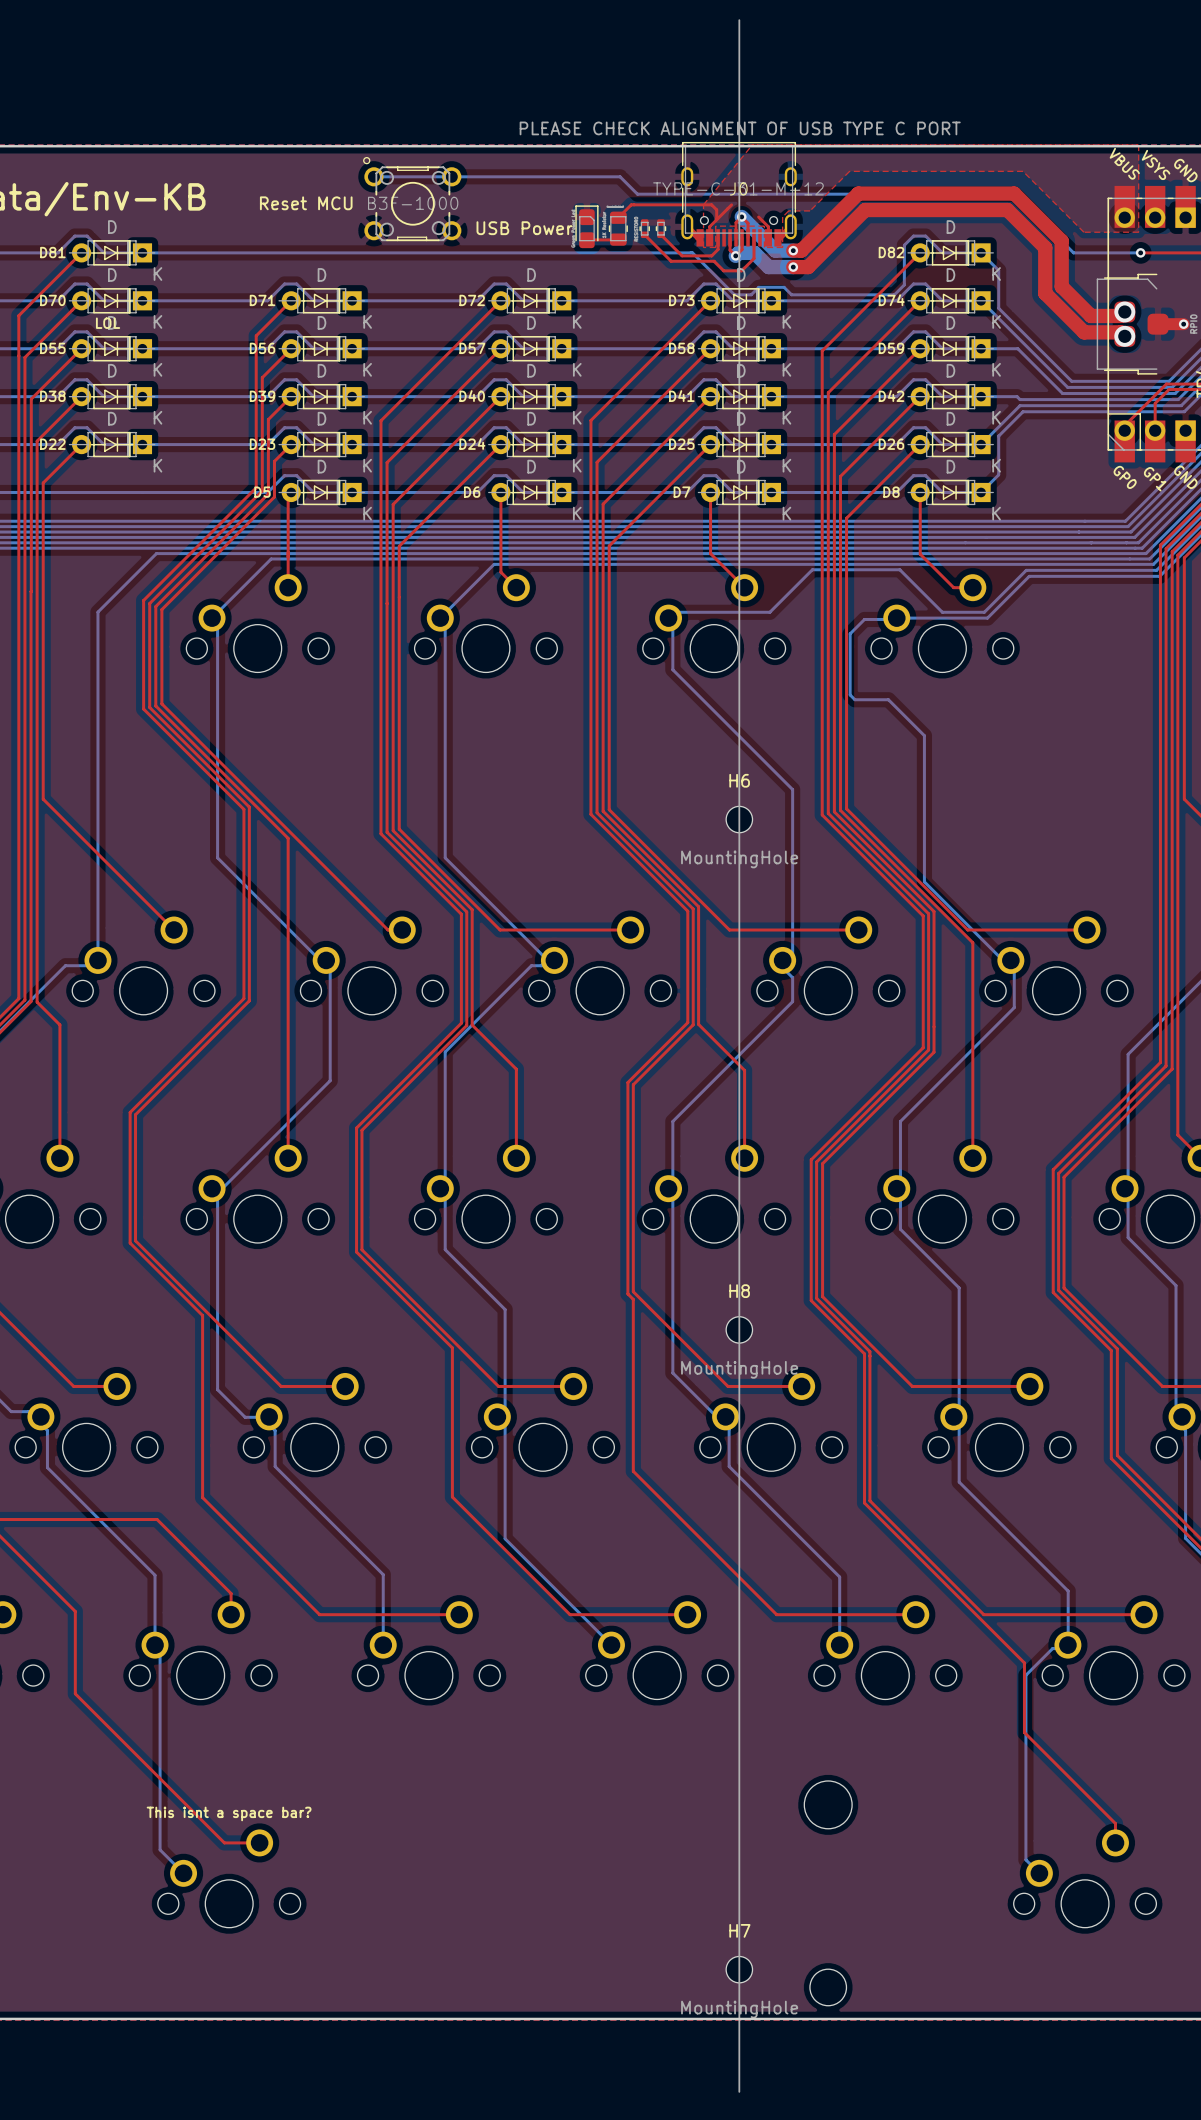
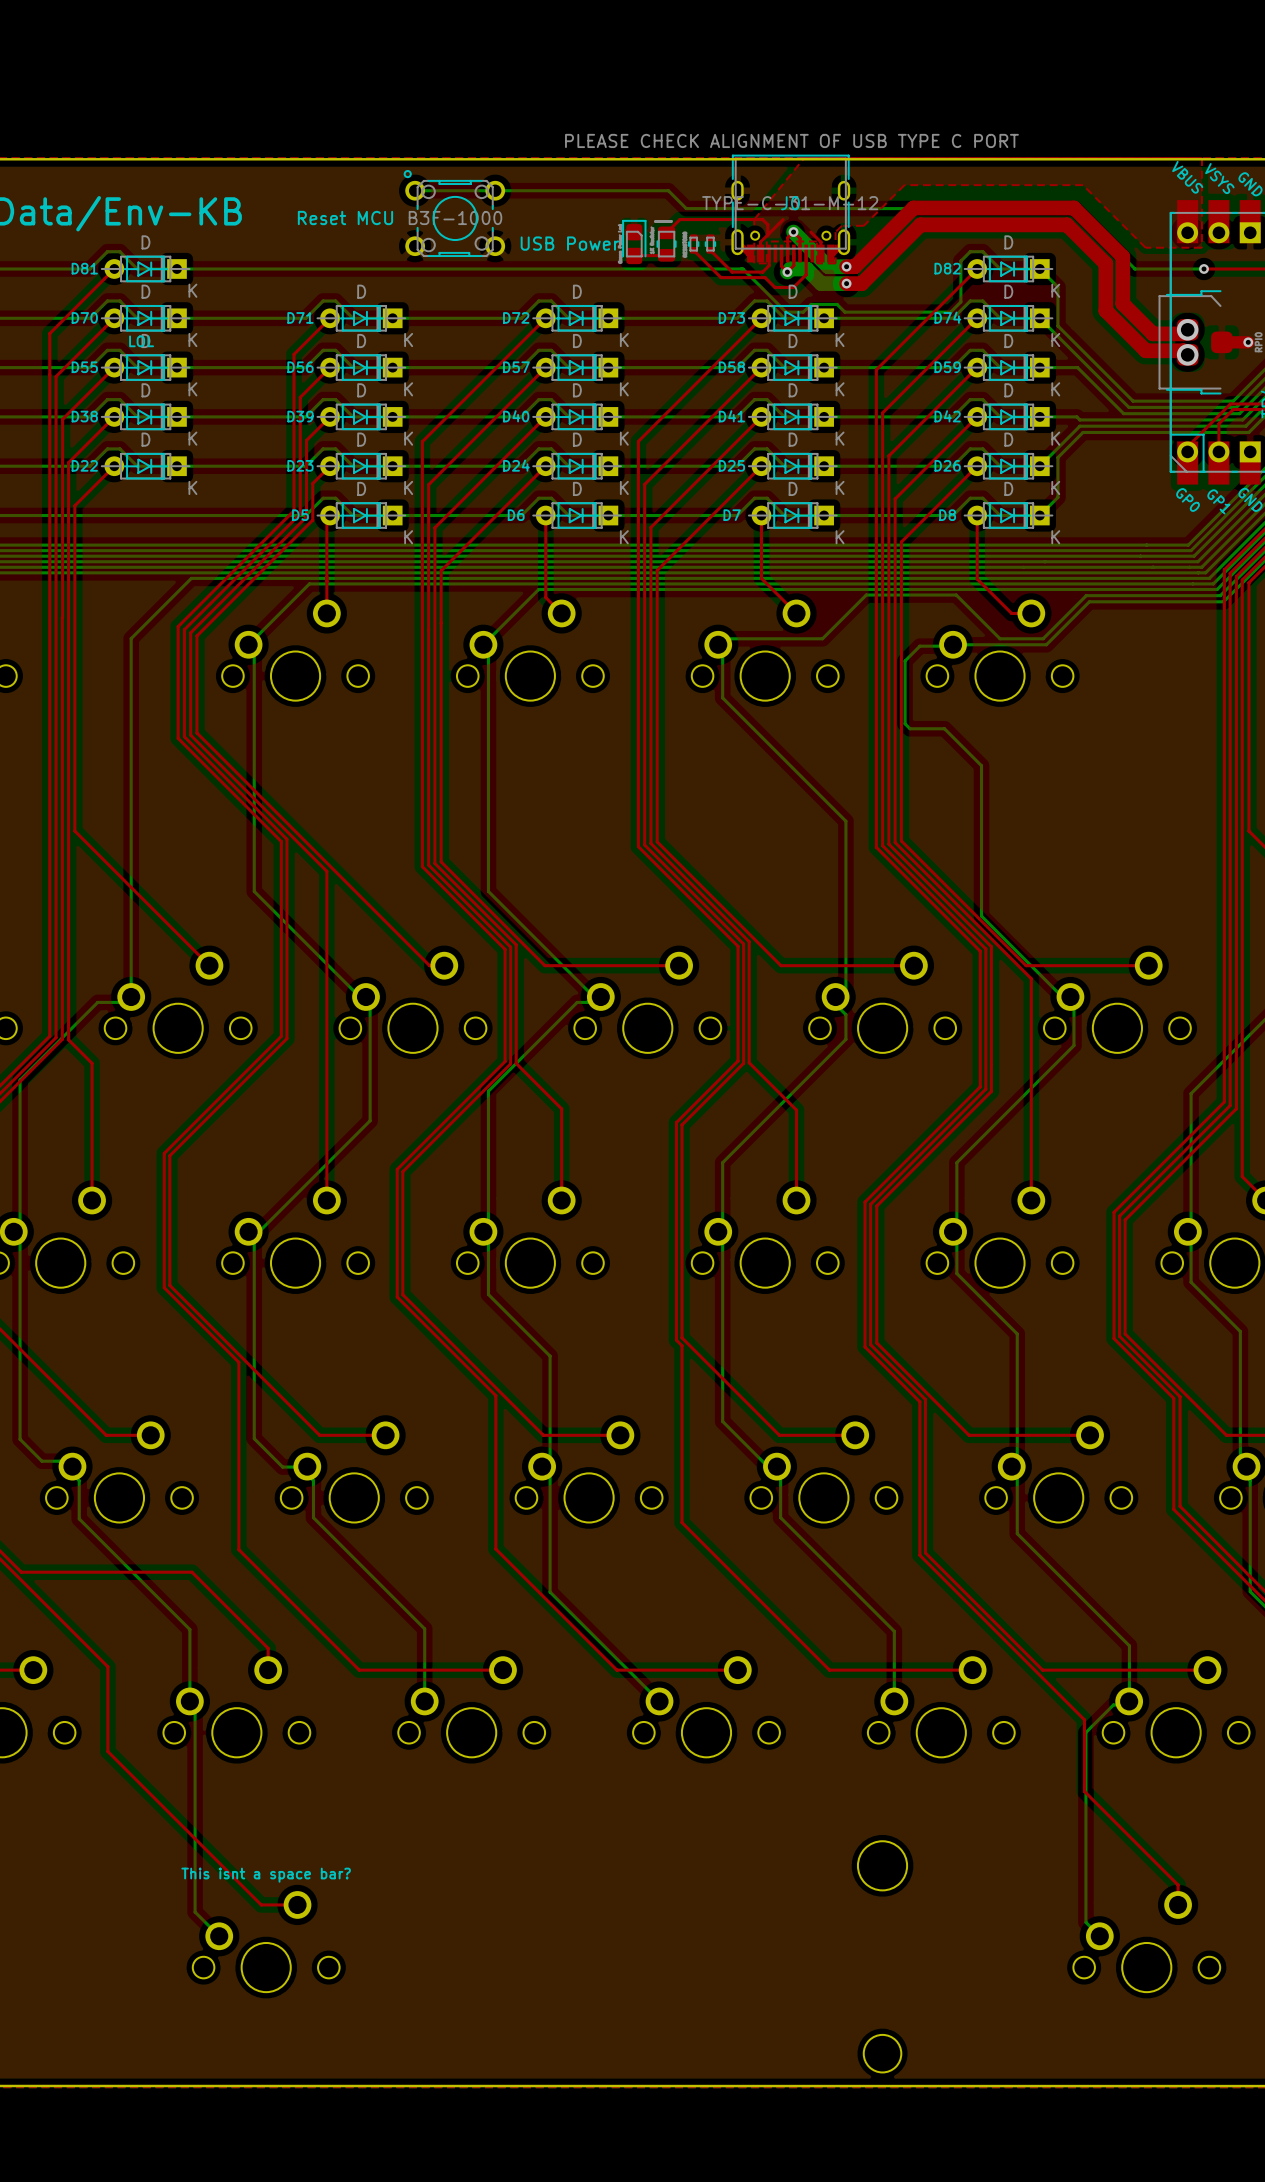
line: (739, 20) (739, 2091) -> none
H6: MountingHole (739, 819) -> none
H8: MountingHole (739, 1329) -> none
H7: MountingHole (739, 1969) -> none

